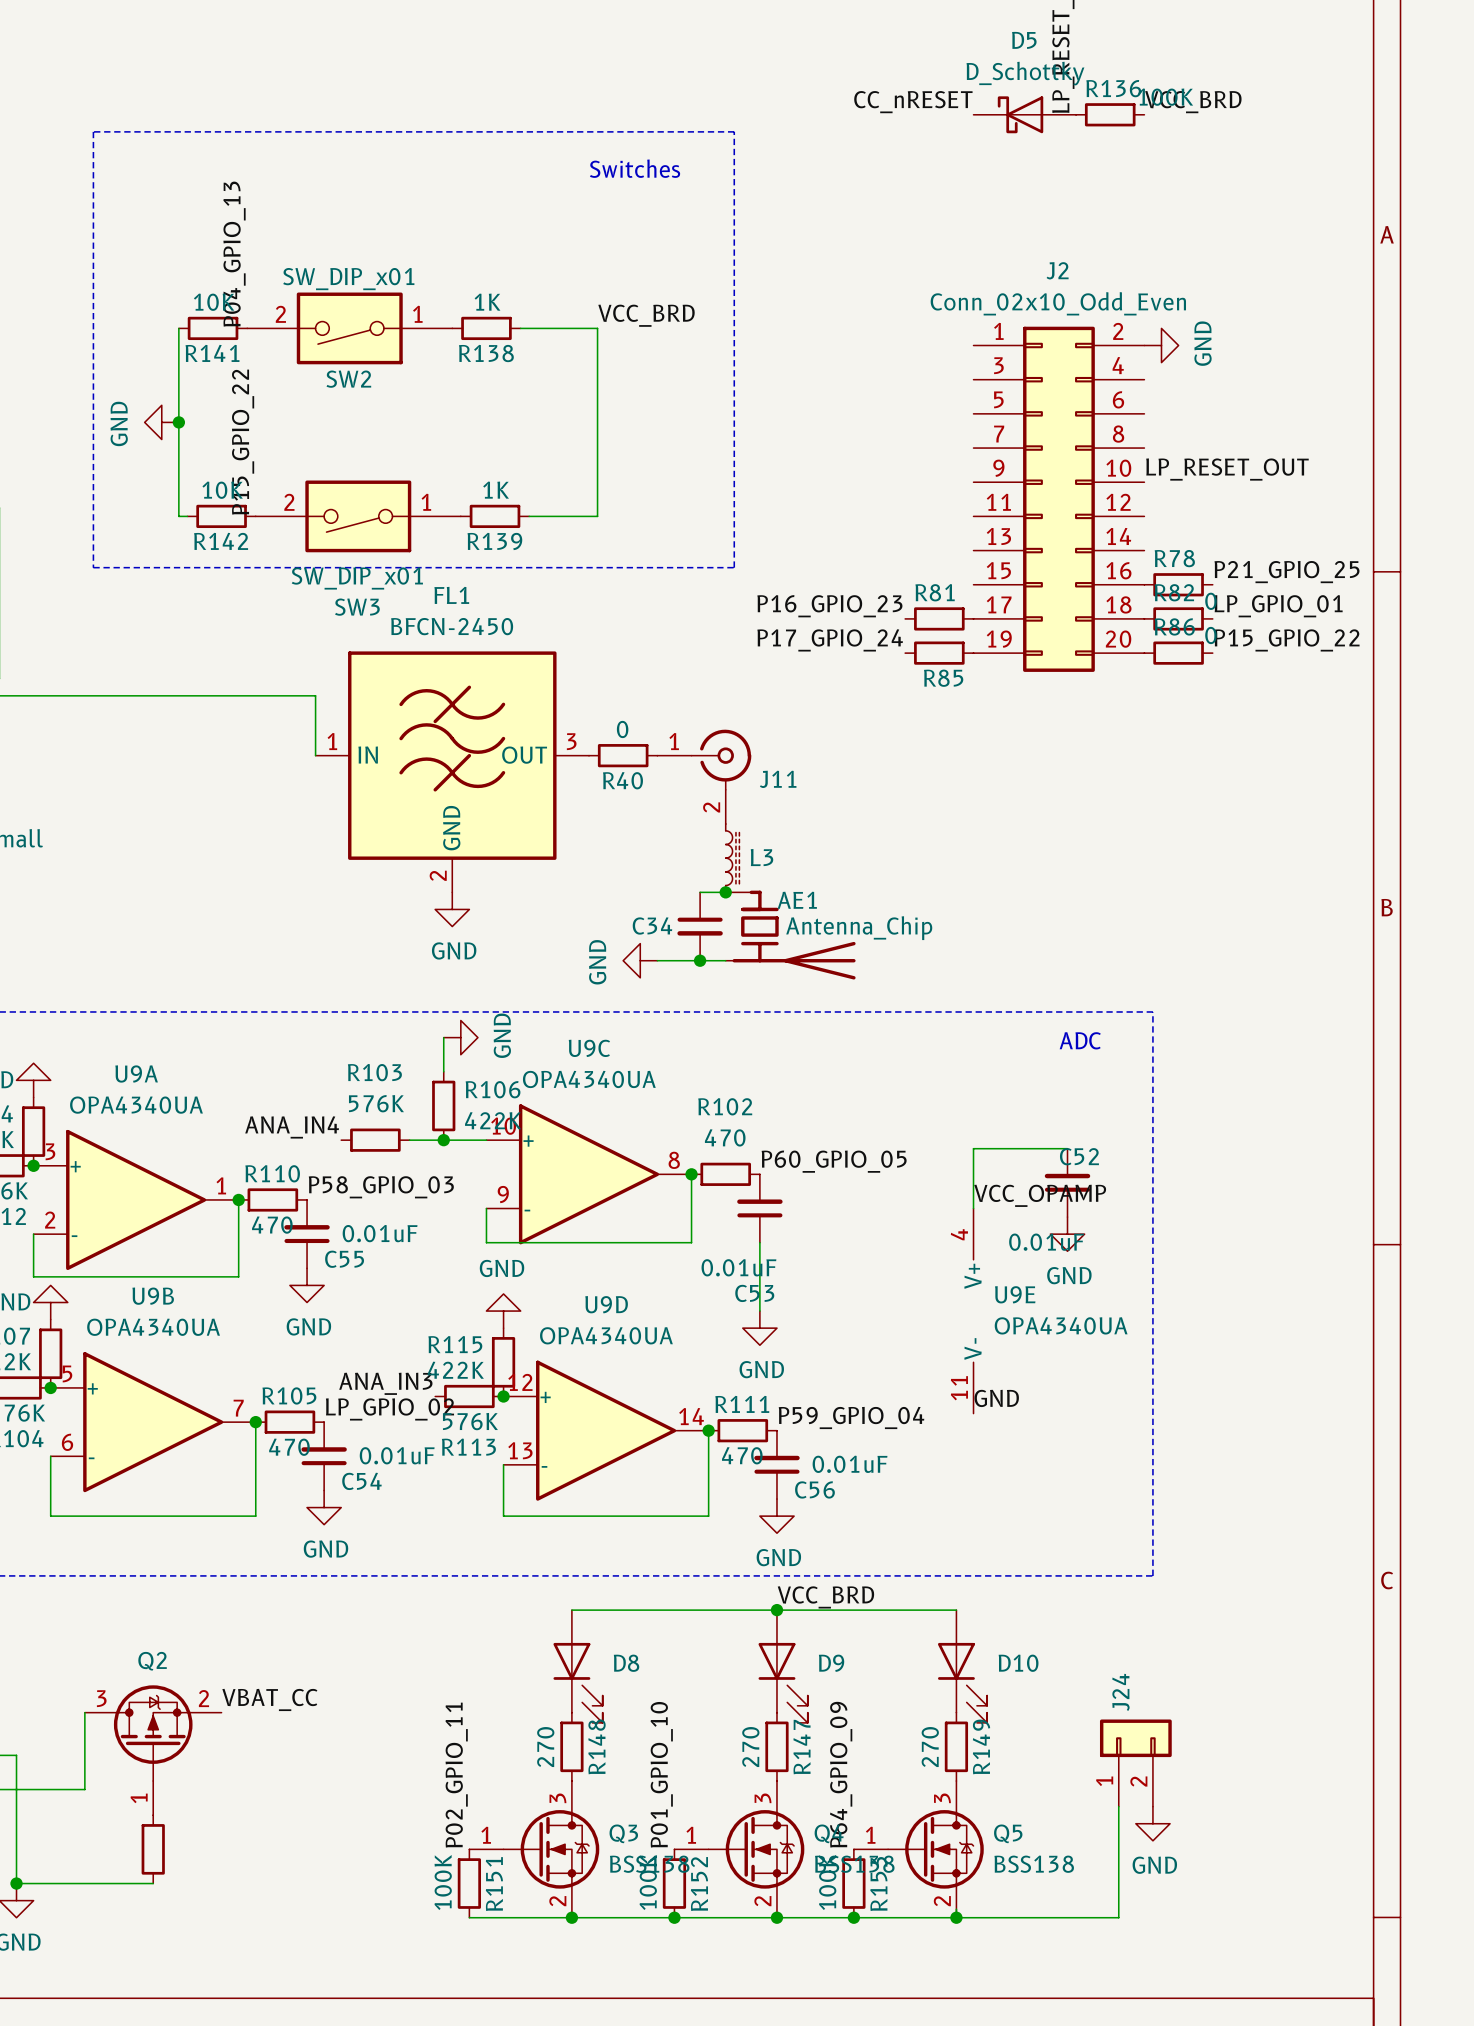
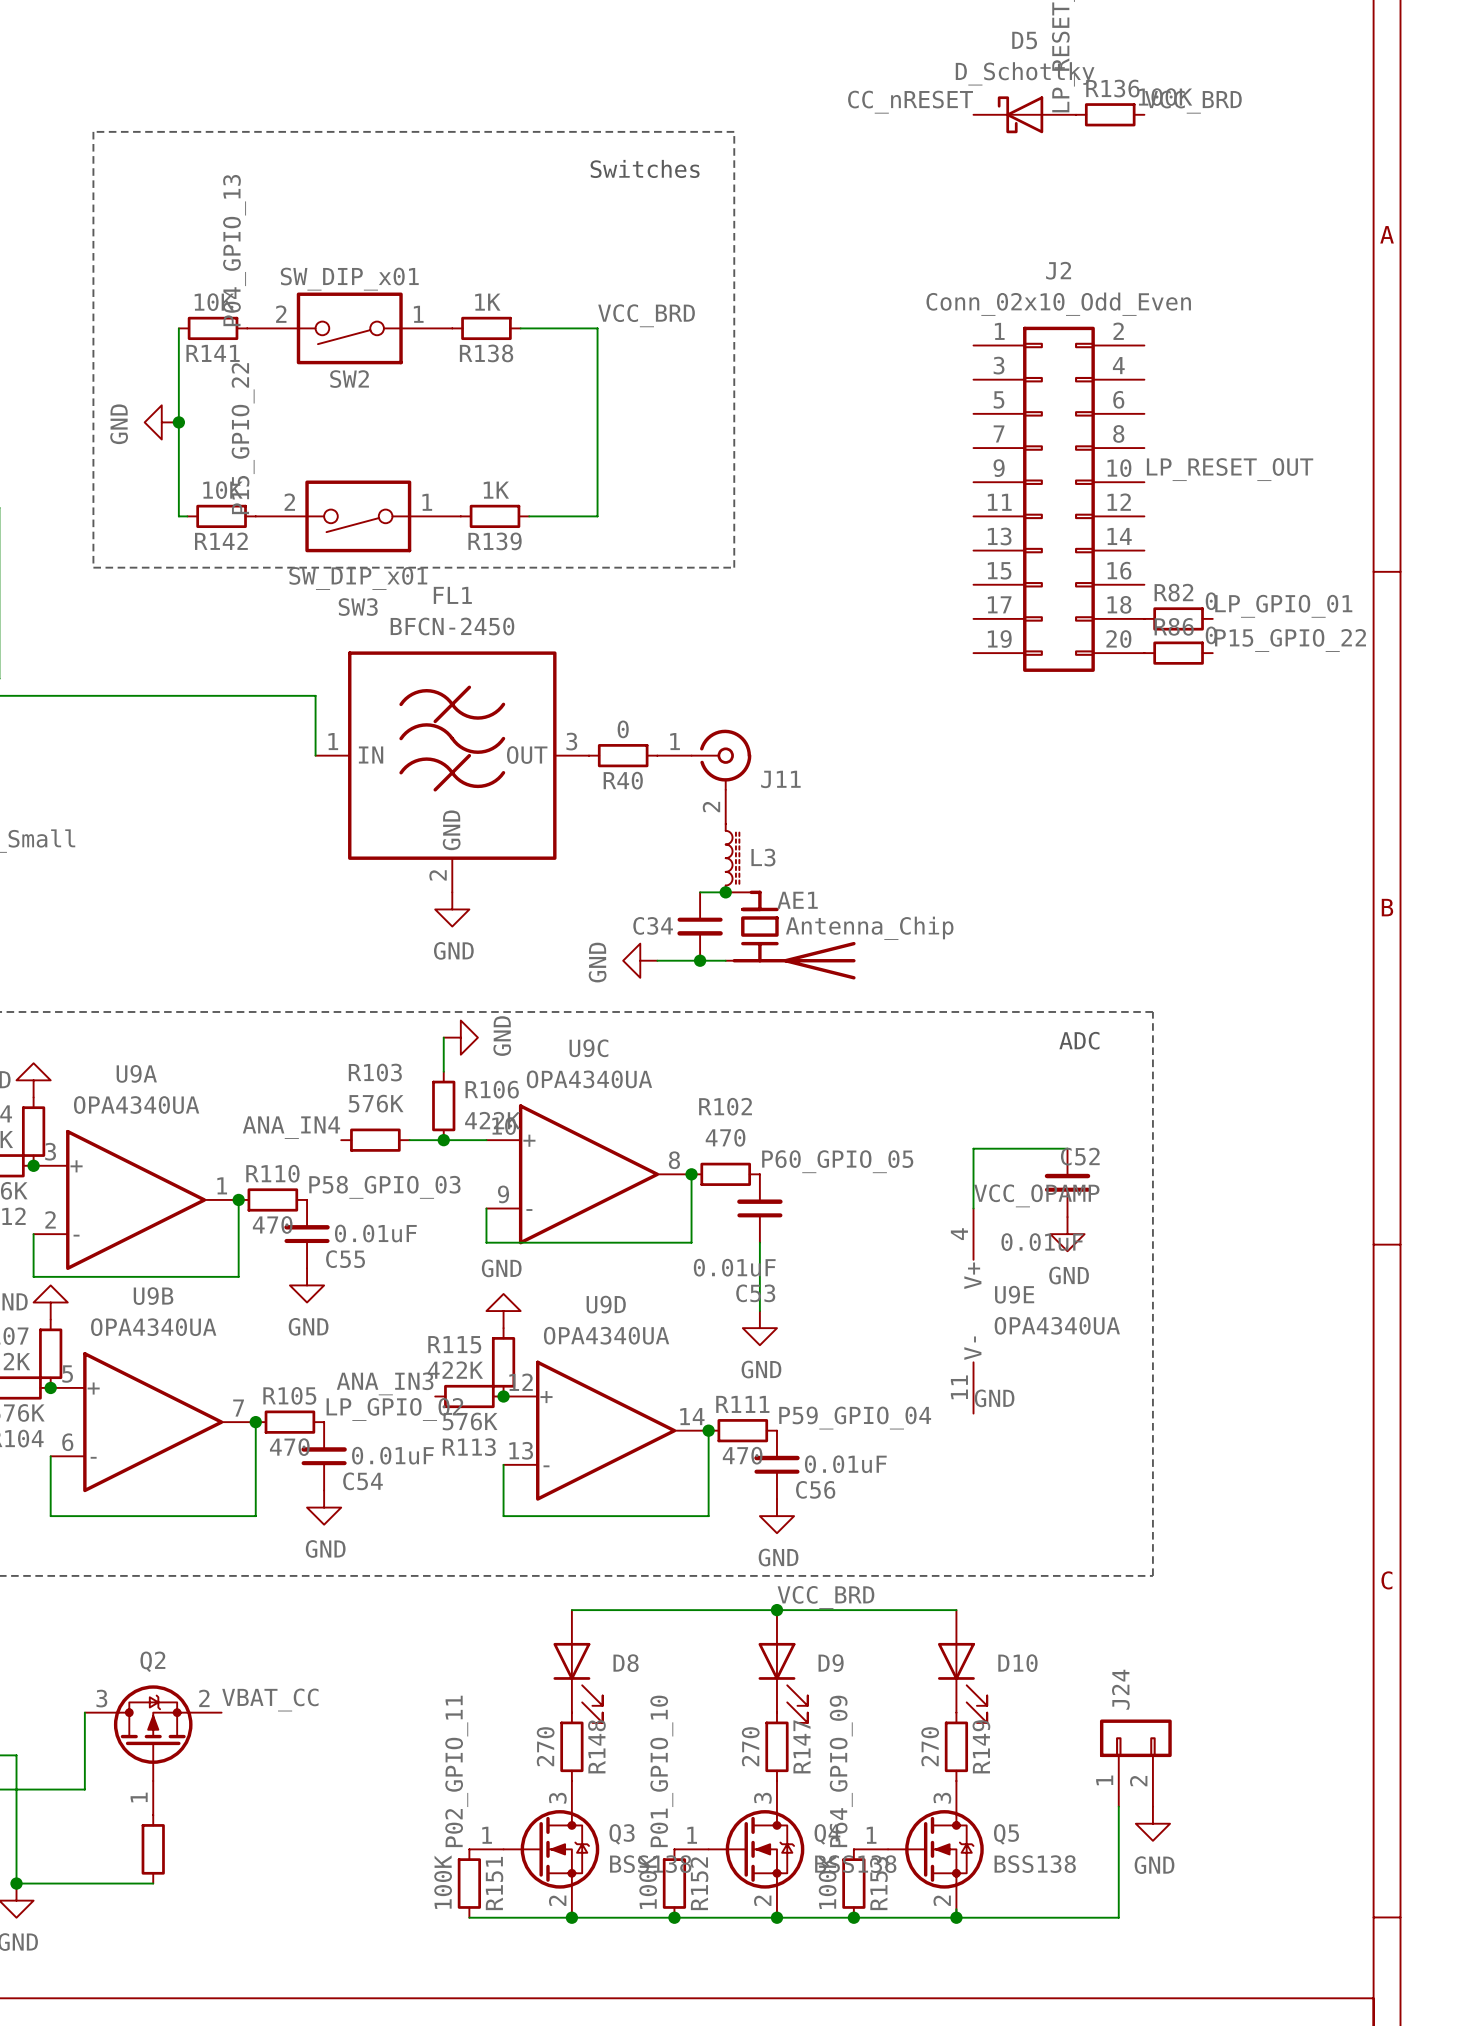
power symbol: GND (1161, 345) -> none
label: P21_GPIO_25 (1286, 572) -> none
R78: (1178, 584) -> none
label: P16_GPIO_23 (829, 606) -> none
R81: (939, 618) -> none
label: P17_GPIO_24 (830, 640) -> none
R85: (939, 653) -> none

